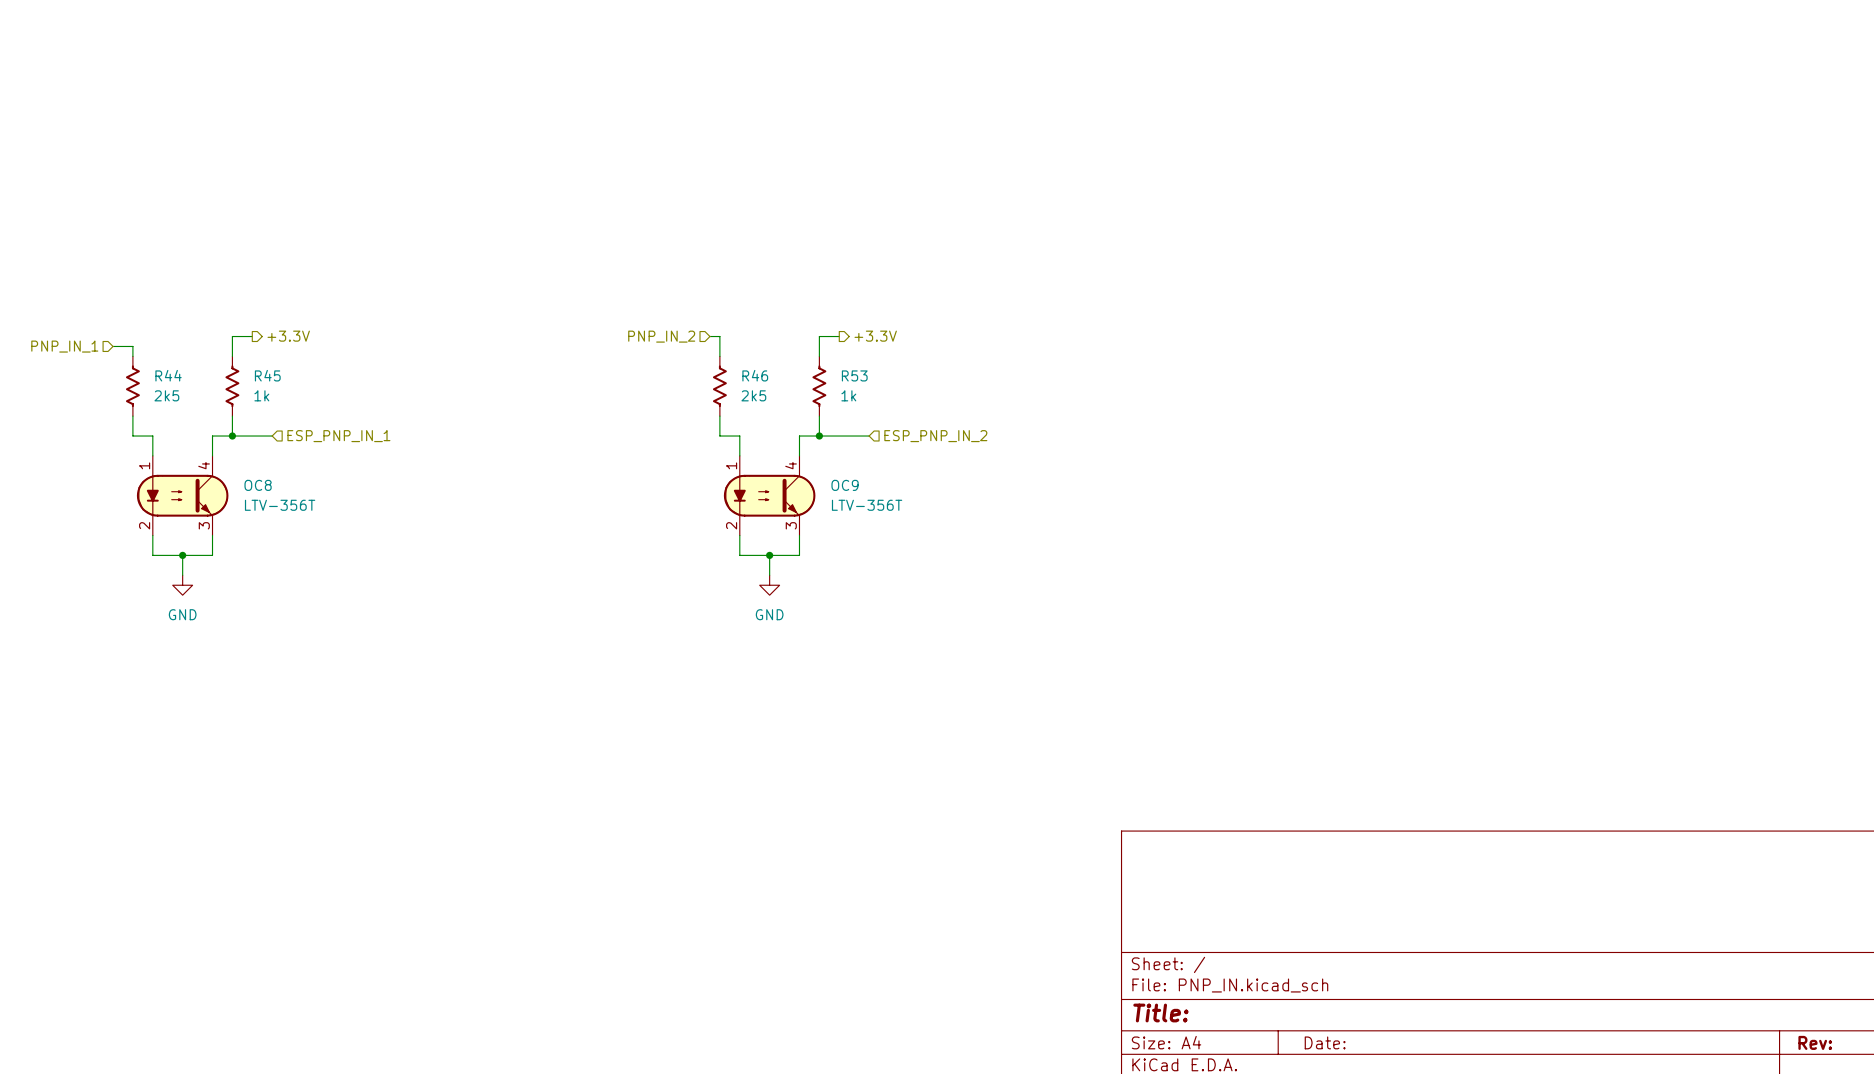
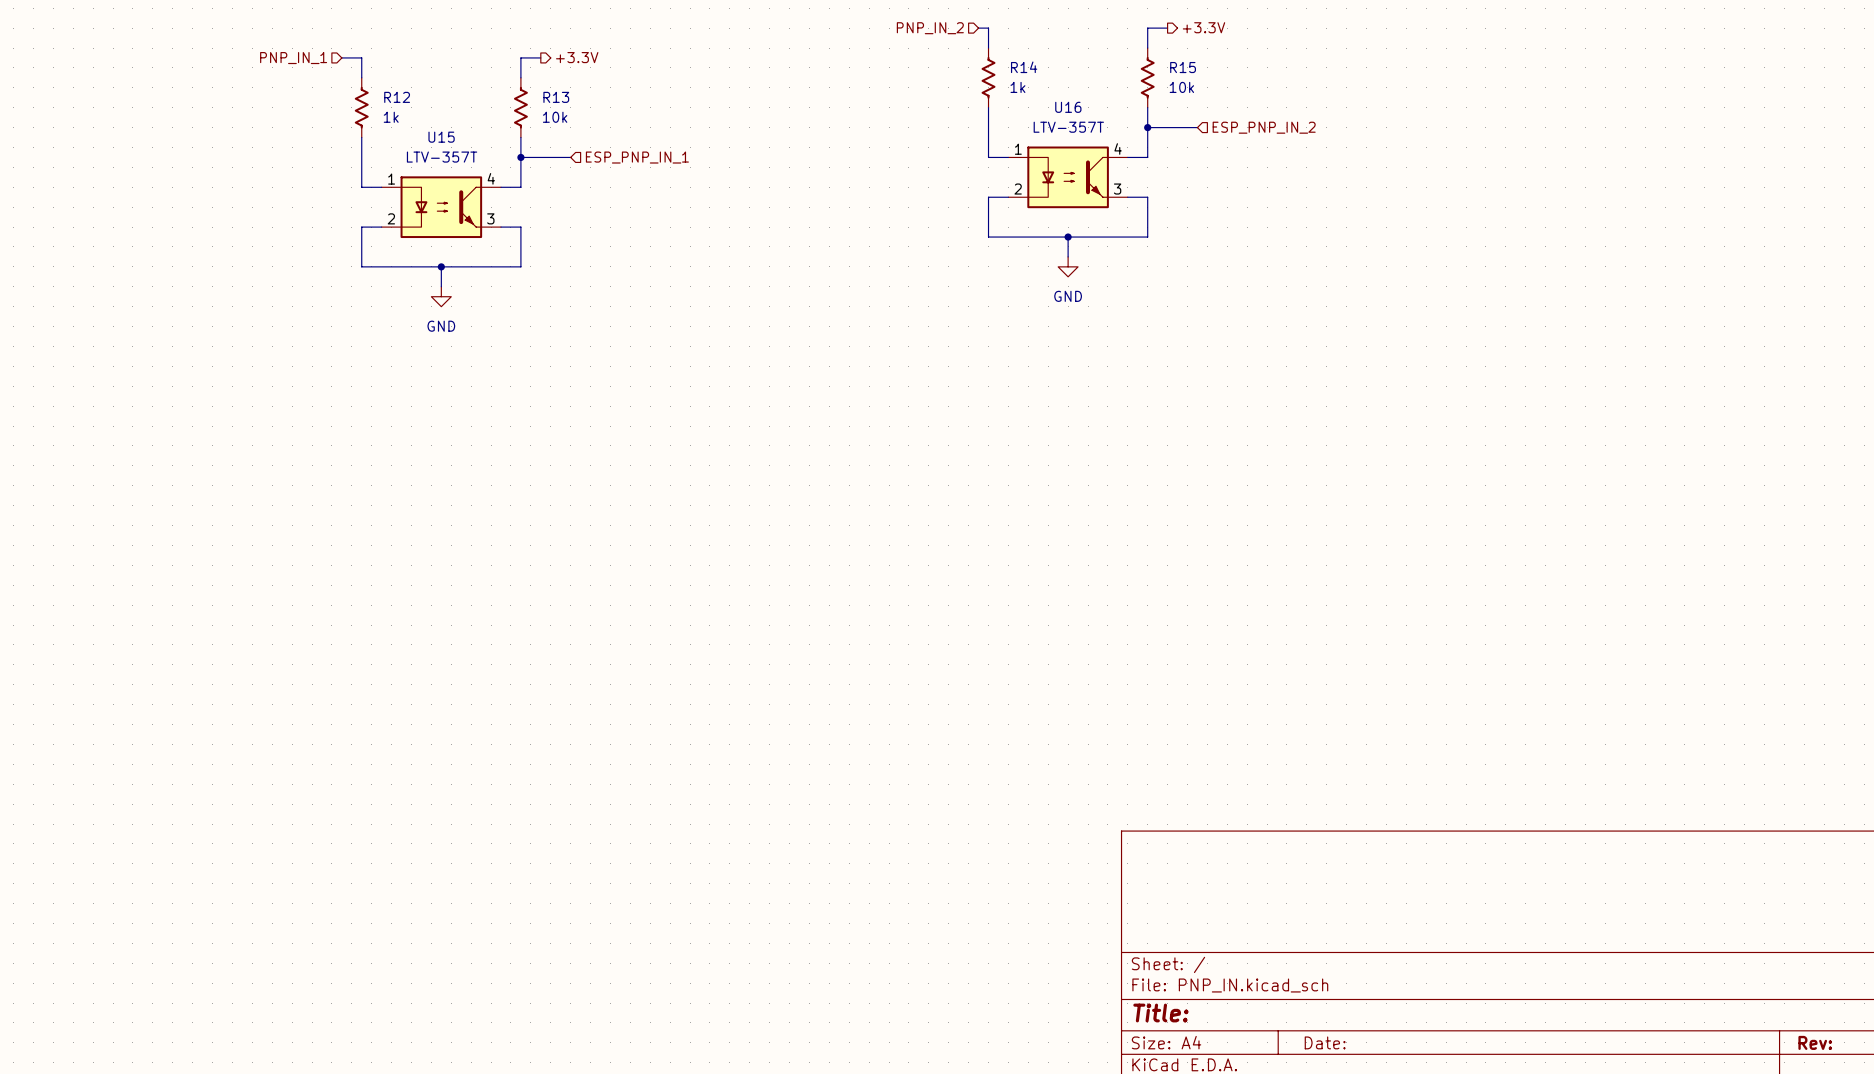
hierarchical label: none -> +3.3V (1203, 27)
hierarchical label: none -> PNP_IN_2 (930, 28)
wire: none -> (978, 28) (988, 28) (988, 48)
wire: none -> (1167, 28) (1147, 28) (1147, 48)
wire: none -> (341, 57) (361, 57) (361, 77)
wire: none -> (540, 57) (520, 57) (520, 77)
hierarchical label: none -> +3.3V (577, 57)
hierarchical label: none -> PNP_IN_1 (293, 58)
R14: none -> 1k (988, 77)
R15: none -> 10k (1147, 77)
R12: none -> 1k (361, 107)
R13: none -> 10k (520, 107)
wire: none -> (988, 107) (988, 157) (1008, 157)
wire: none -> (1147, 107) (1147, 157) (1127, 157)
wire: none -> (1147, 127) (1197, 127)
junction: none -> (1147, 127)
hierarchical label: none -> ESP_PNP_IN_2 (1264, 127)
wire: none -> (361, 137) (361, 187) (381, 187)
wire: none -> (520, 137) (520, 187) (501, 187)
wire: none -> (520, 157) (570, 157)
junction: none -> (520, 157)
hierarchical label: none -> ESP_PNP_IN_1 (637, 157)
U16: none -> LTV-357T (1068, 177)
wire: none -> (1008, 197) (988, 197) (988, 237) (1147, 237) (1147, 197) (1127, 197)
U15: none -> LTV-357T (441, 207)
wire: none -> (381, 227) (361, 227) (361, 266) (520, 266) (520, 227) (501, 227)
wire: none -> (1068, 237) (1068, 256)
junction: none -> (1068, 237)
wire: none -> (441, 266) (441, 286)
junction: none -> (441, 266)
power symbol: none -> GND (1068, 266)
power symbol: none -> GND (441, 296)
wire: (252, 336) (232, 336) (232, 356) -> none
hierarchical label: +3.3V (288, 336) -> none
hierarchical label: PNP_IN_2 (661, 336) -> none
wire: (709, 336) (719, 336) (719, 356) -> none
wire: (839, 336) (819, 336) (819, 356) -> none
hierarchical label: +3.3V (875, 336) -> none
hierarchical label: PNP_IN_1 (64, 346) -> none
wire: (113, 346) (132, 346) (132, 356) -> none
R44: 2k5 (132, 386) -> none
R45: 1k (232, 386) -> none
R46: 2k5 (719, 386) -> none
R53: 1k (819, 386) -> none
wire: (132, 416) (132, 436) (152, 436) (152, 455) -> none
wire: (232, 416) (232, 436) -> none
wire: (719, 416) (719, 436) (739, 436) (739, 455) -> none
wire: (819, 416) (819, 436) -> none
junction: (232, 436) -> none
wire: (272, 436) (212, 436) (212, 455) -> none
hierarchical label: ESP_PNP_IN_1 (338, 436) -> none
junction: (819, 436) -> none
wire: (869, 436) (799, 436) (799, 455) -> none
hierarchical label: ESP_PNP_IN_2 (935, 436) -> none
OC8: LTV-356T (182, 495) -> none
OC9: LTV-356T (769, 495) -> none
wire: (152, 535) (152, 555) (212, 555) (212, 535) -> none
wire: (739, 535) (739, 555) (799, 555) (799, 535) -> none
wire: (182, 555) (182, 575) -> none
junction: (182, 555) -> none
wire: (769, 555) (769, 575) -> none
junction: (769, 555) -> none
power symbol: GND (182, 585) -> none
power symbol: GND (769, 585) -> none

